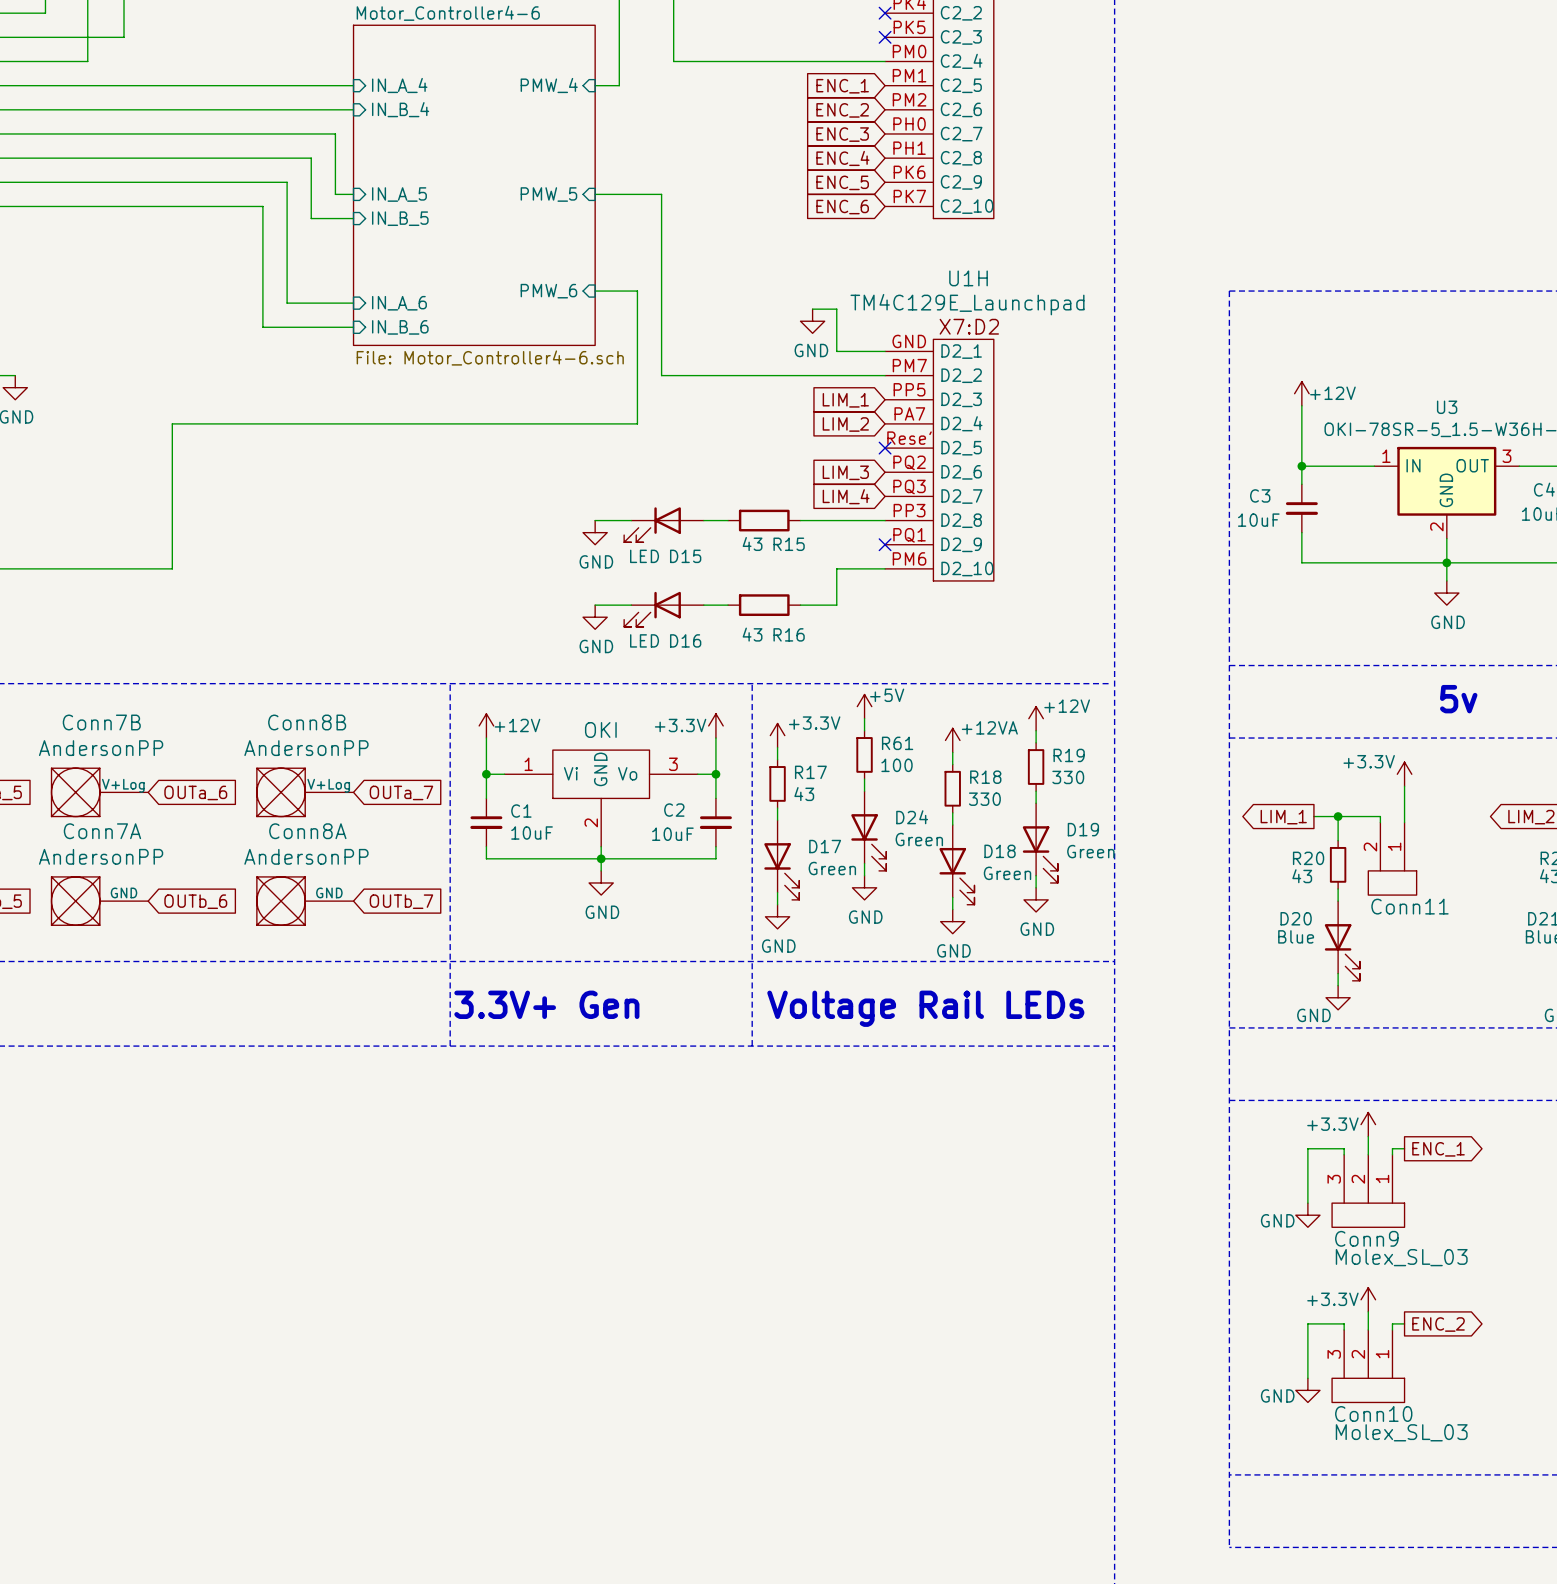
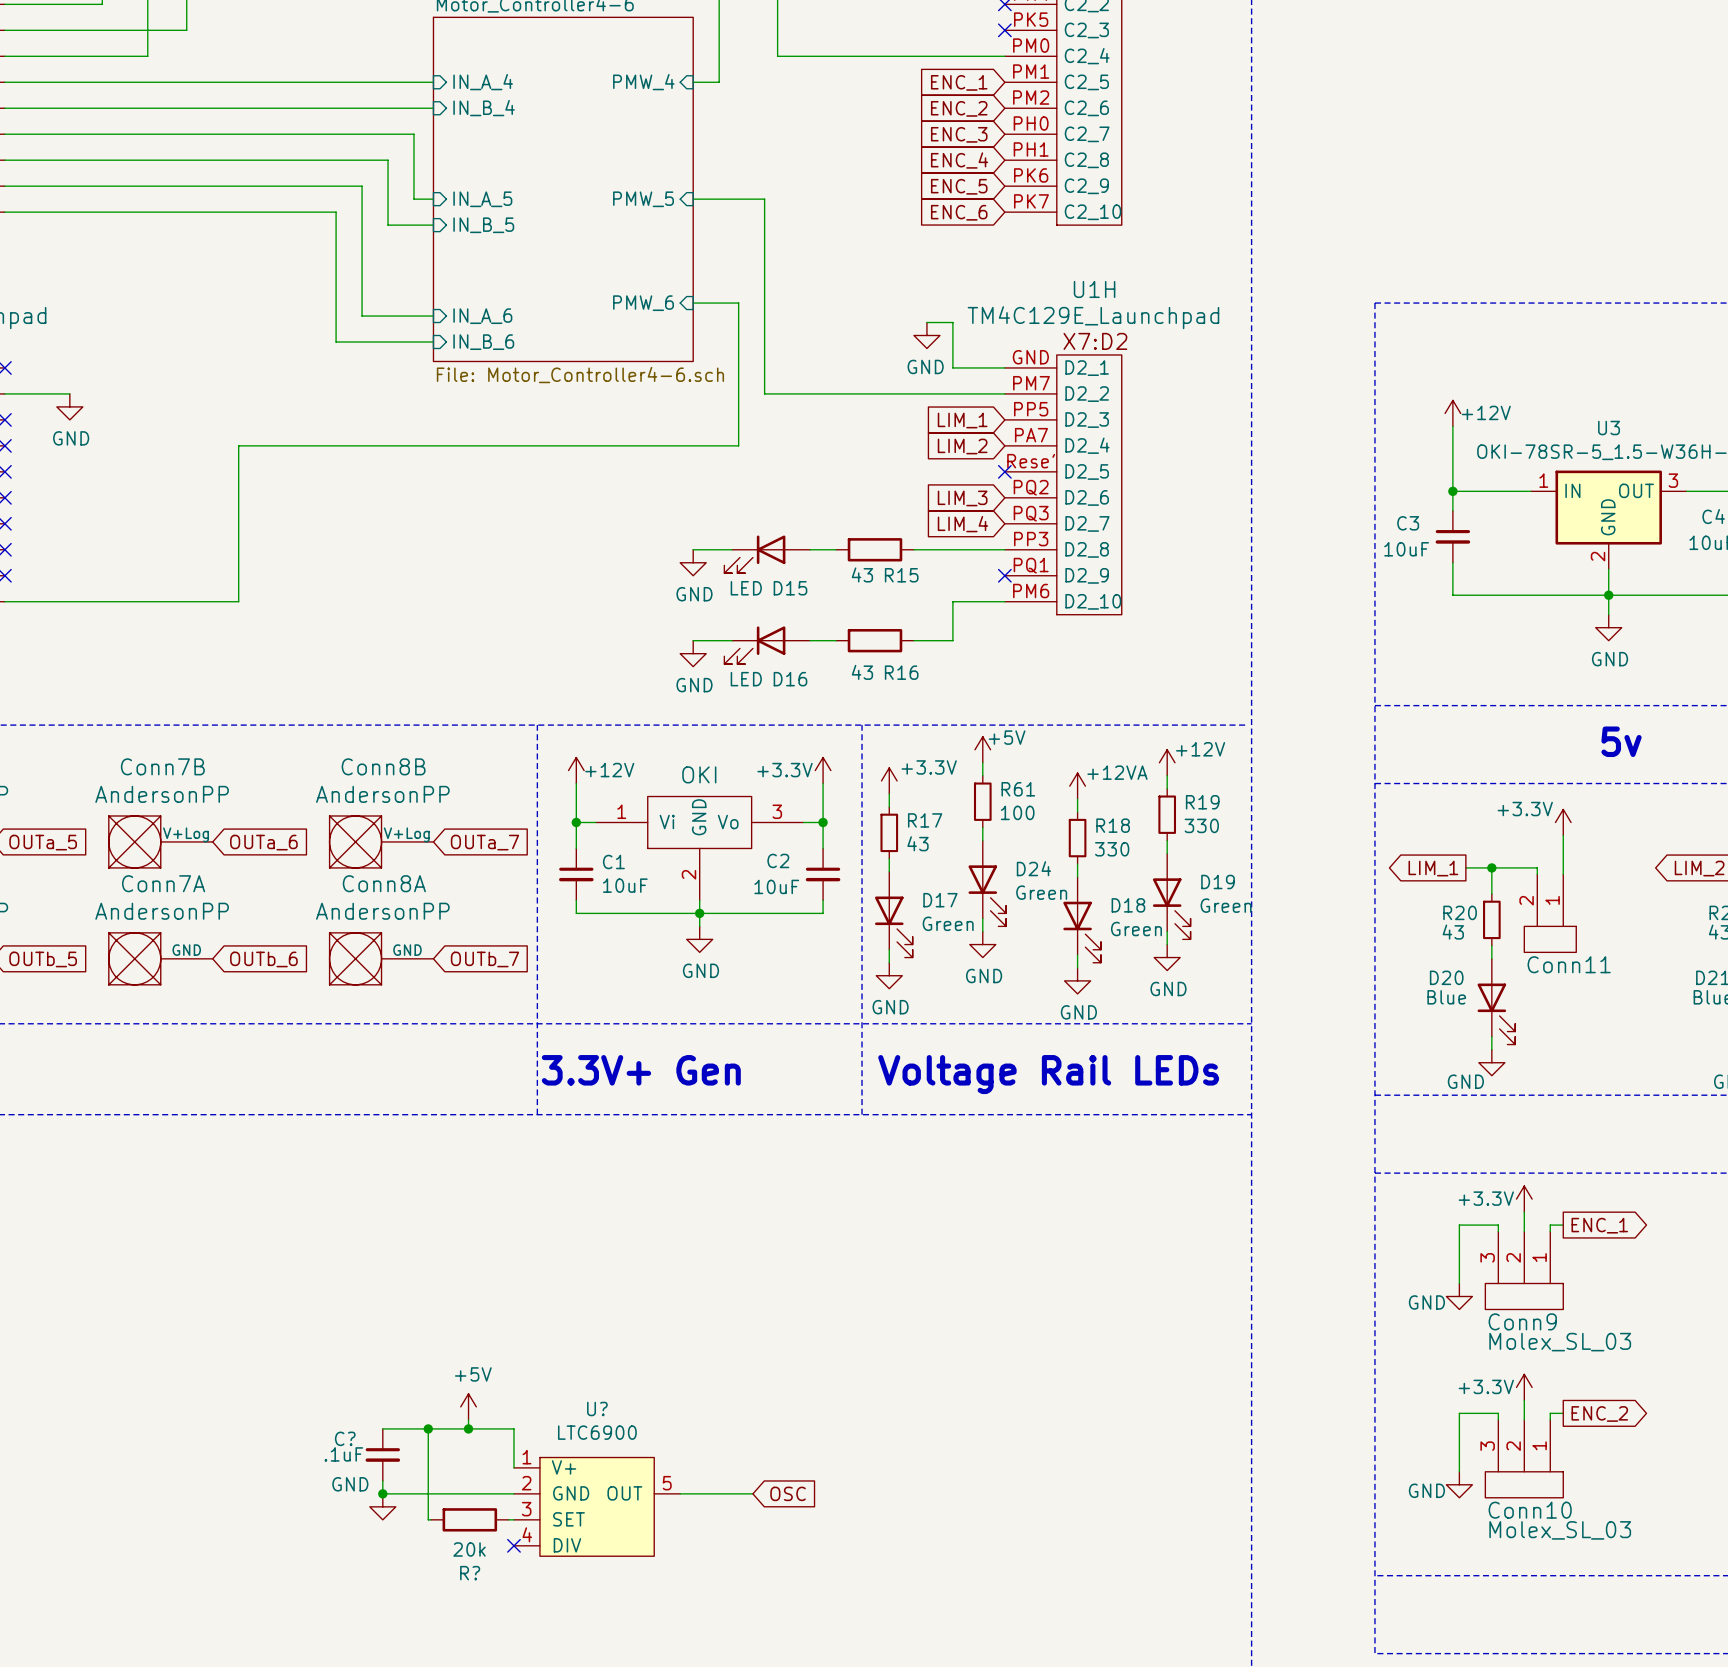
power symbol: none -> +5V (468, 1406)
wire: none -> (468, 1419) (468, 1428)
wire: none -> (382, 1428) (513, 1428) (513, 1467)
wire: none -> (428, 1428) (428, 1519) (430, 1519)
junction: none -> (428, 1428)
junction: none -> (468, 1428)
C?: none -> .1uF (382, 1454)
wire: none -> (382, 1480) (382, 1493) (513, 1493)
junction: none -> (382, 1493)
wire: none -> (680, 1493) (752, 1493)
global label: none -> OSC (788, 1493)
power symbol: none -> GND (382, 1506)
U?: none -> LTC6900 (597, 1506)
R?: none -> 20k (469, 1519)
wire: none -> (508, 1519) (513, 1519)
no-connect mark: none -> (513, 1545)

